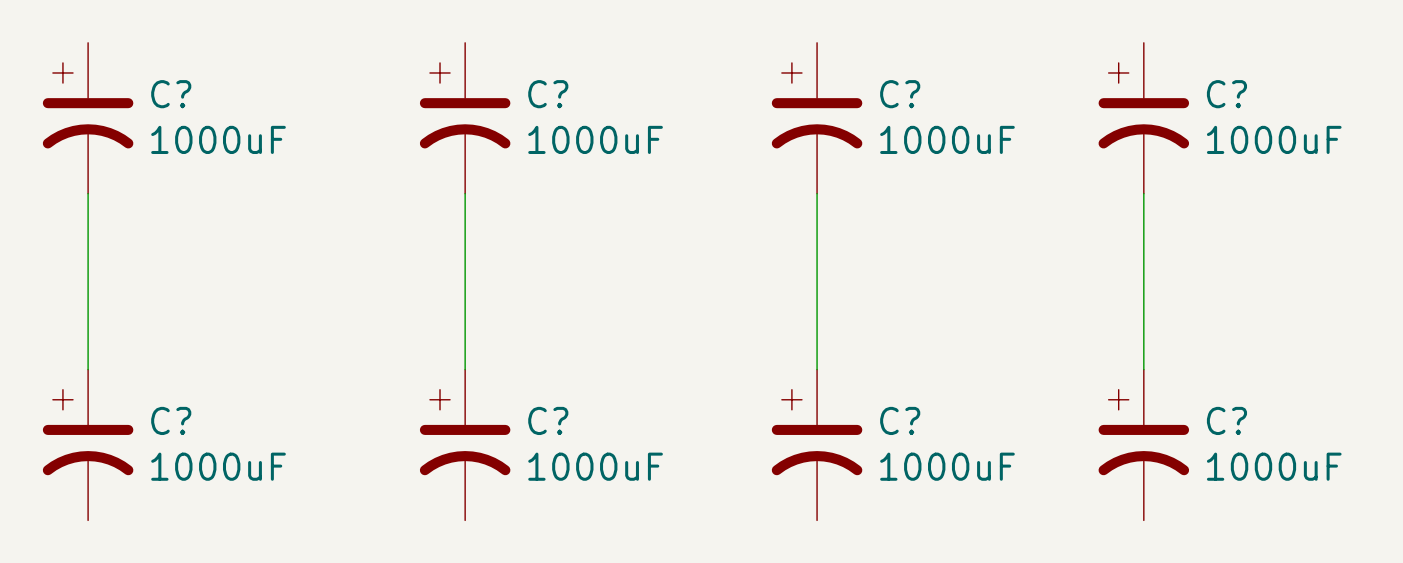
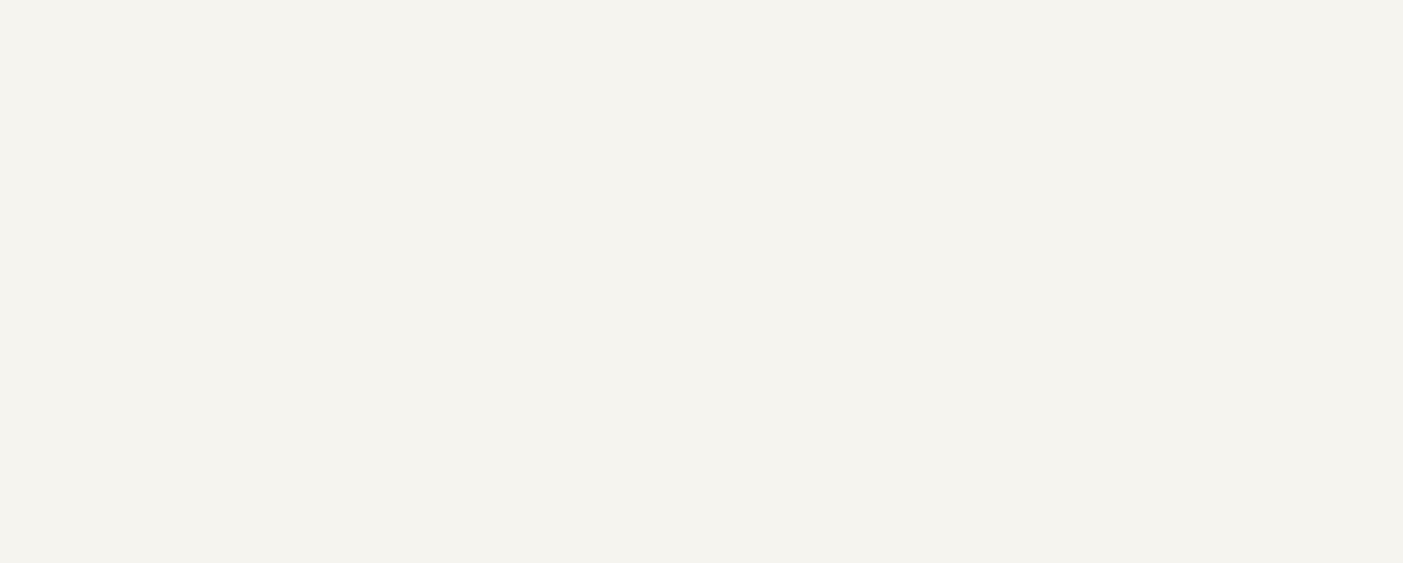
C?: 1000uF (88, 118) -> none
C?: 1000uF (465, 118) -> none
C?: 1000uF (817, 118) -> none
C?: 1000uF (1143, 118) -> none
wire: (88, 193) (88, 369) -> none
wire: (465, 193) (465, 369) -> none
wire: (817, 193) (817, 369) -> none
wire: (1143, 193) (1143, 369) -> none
C?: 1000uF (88, 445) -> none
C?: 1000uF (465, 445) -> none
C?: 1000uF (817, 445) -> none
C?: 1000uF (1143, 445) -> none

